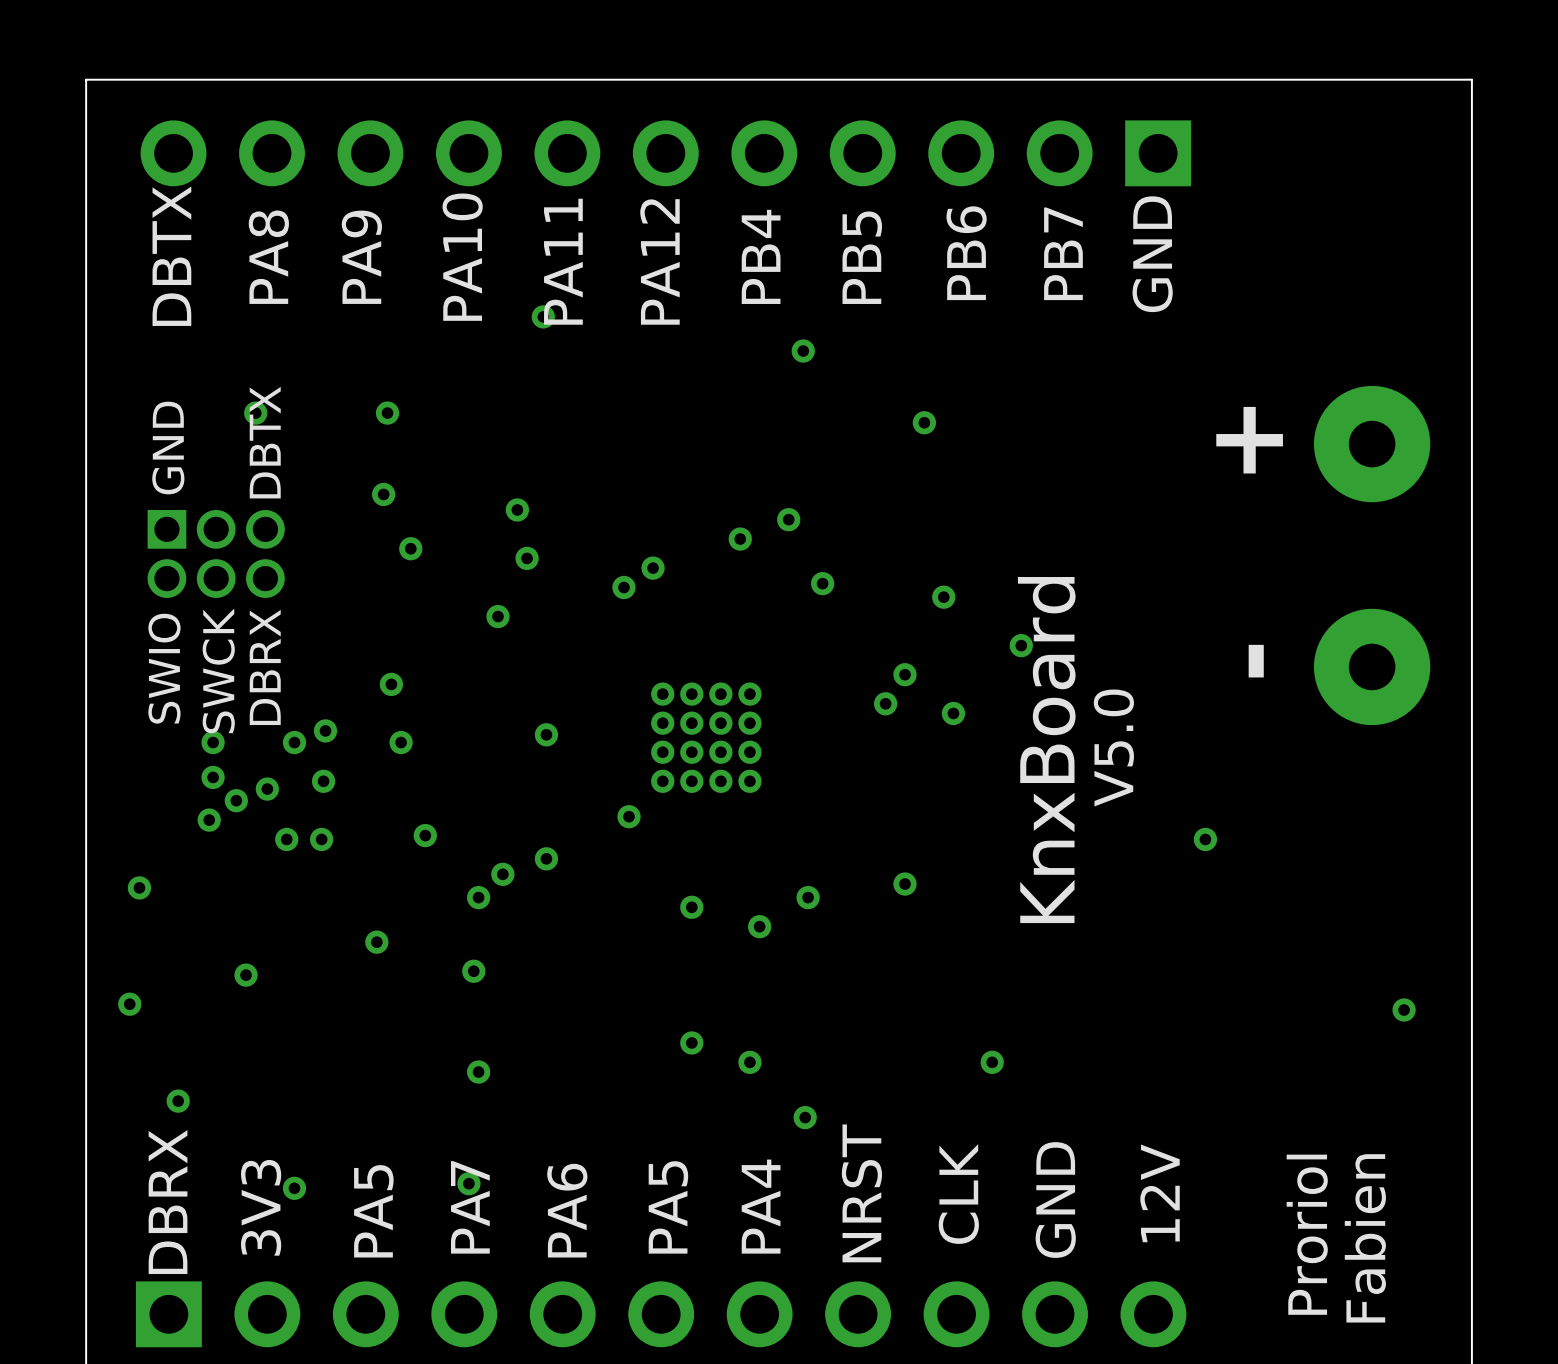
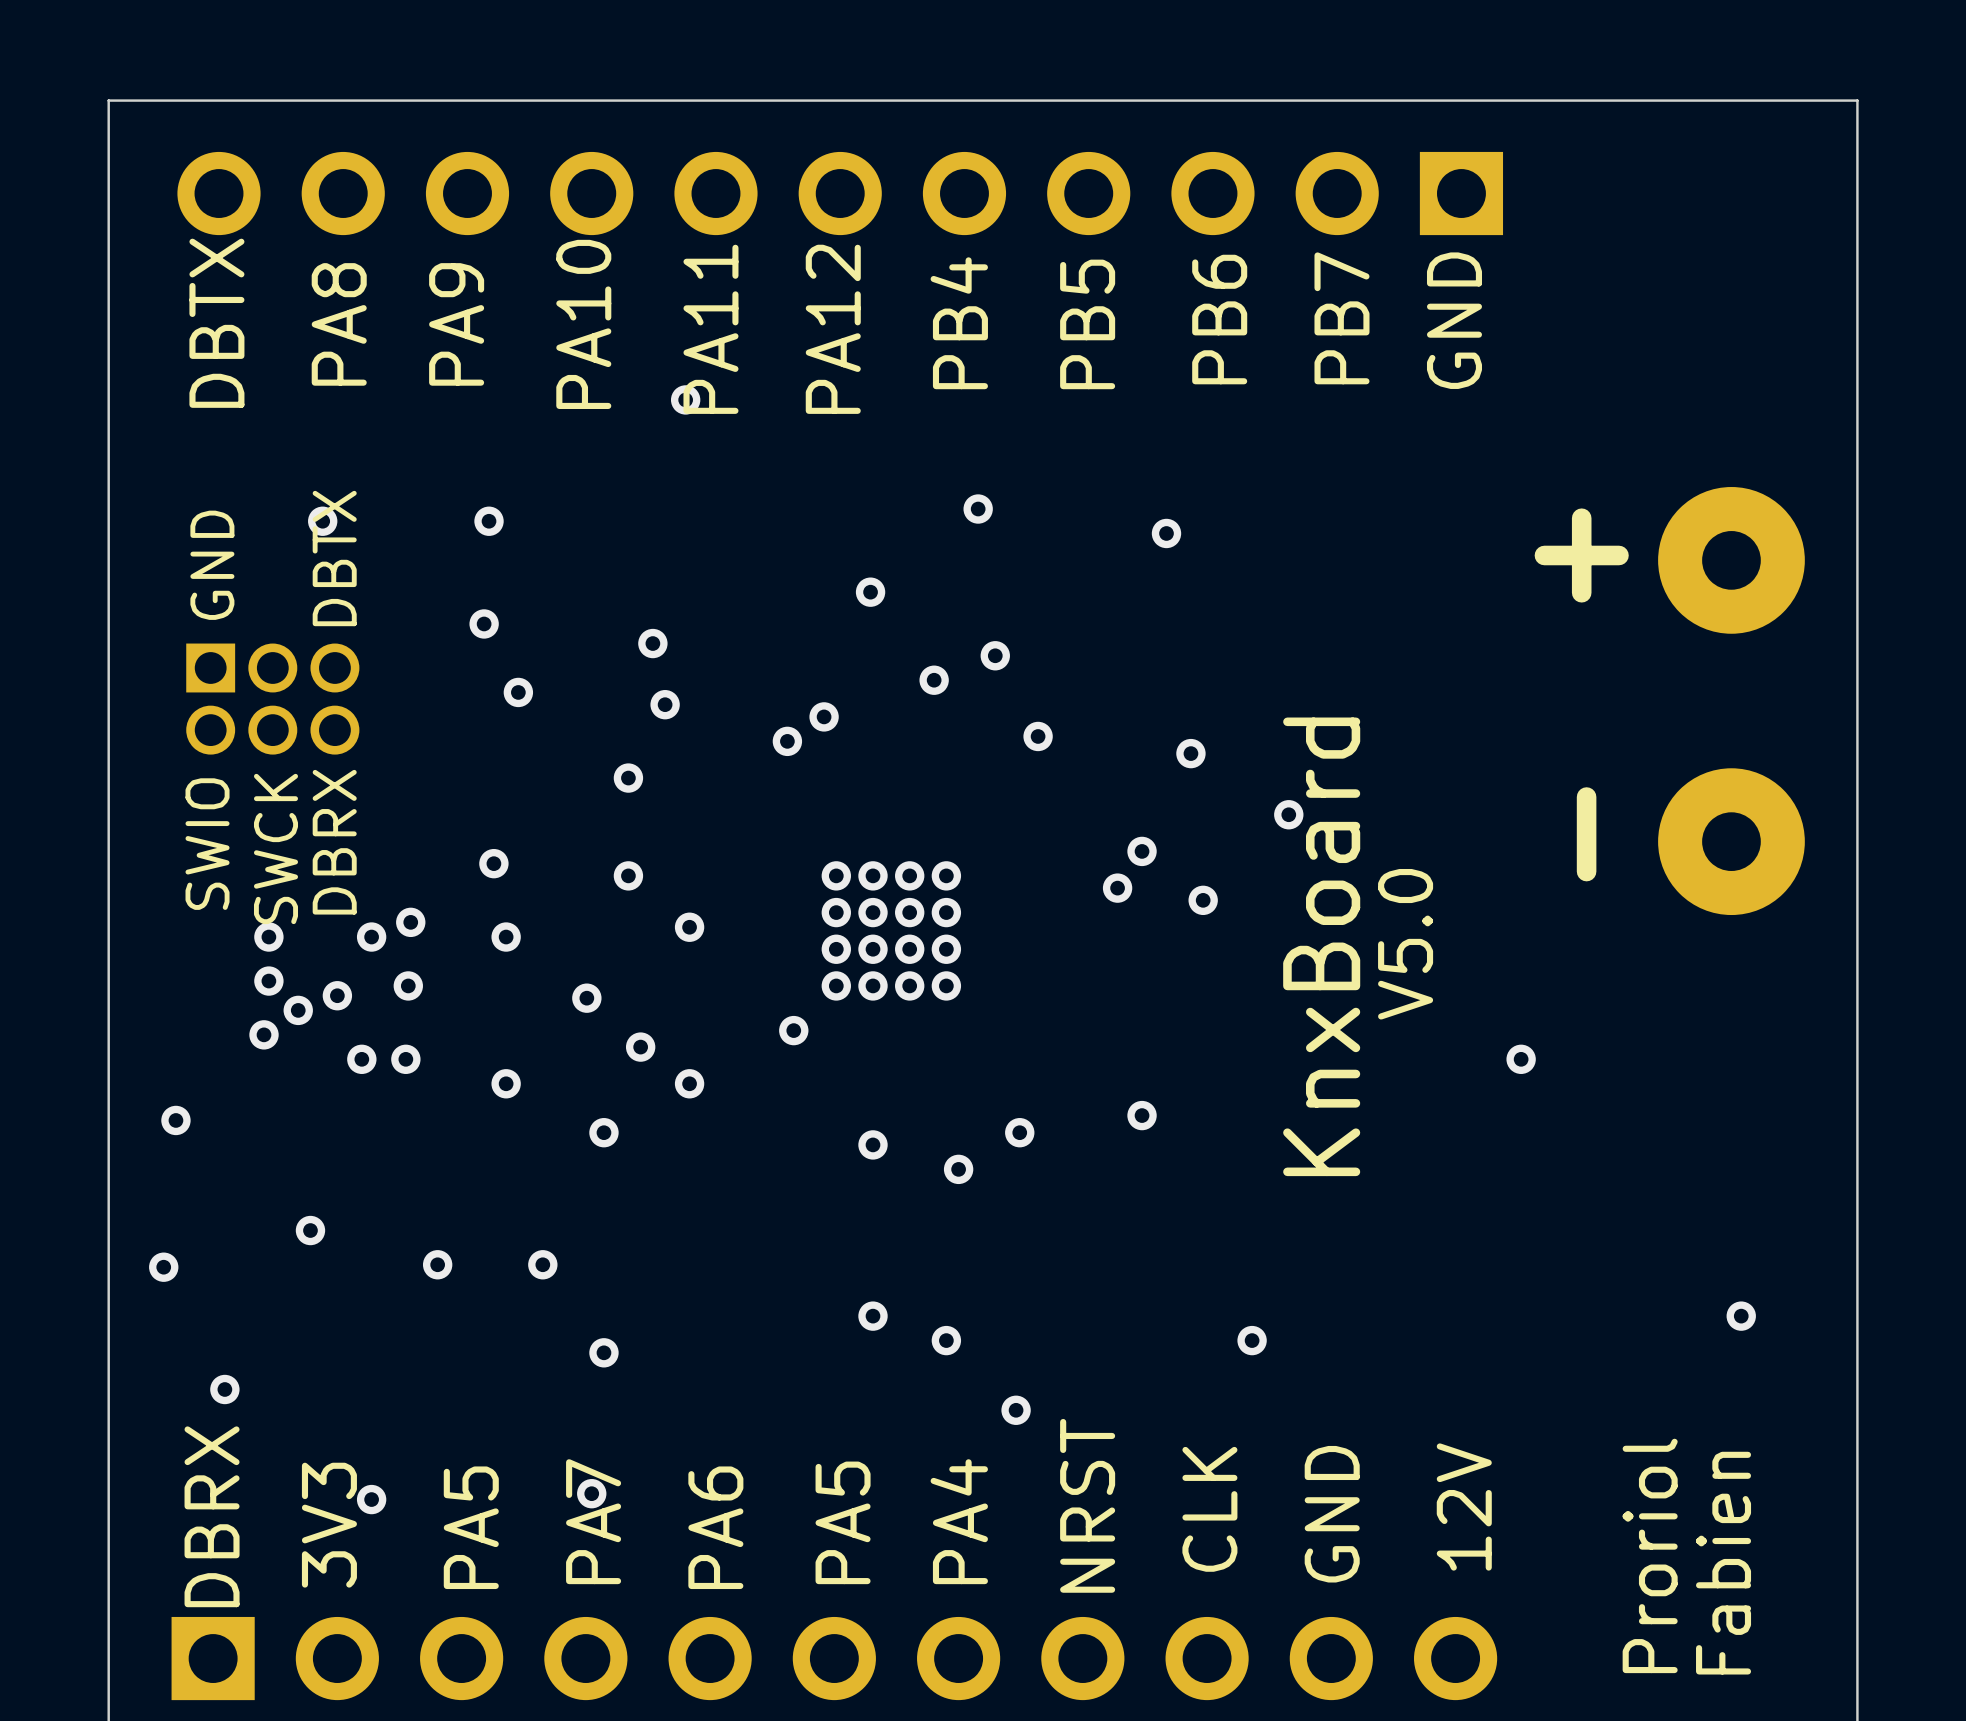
via position: (803, 351) -> (978, 509)
via: none -> (870, 592)
via: none -> (628, 875)
via: none -> (586, 998)
via: none -> (640, 1047)
via: (425, 835) -> none
via: none -> (506, 1083)
via: (502, 874) -> none
via: (376, 942) -> none
via: (473, 971) -> none
via: none -> (437, 1264)
via: none -> (542, 1264)
via position: (1404, 1010) -> (1741, 1316)

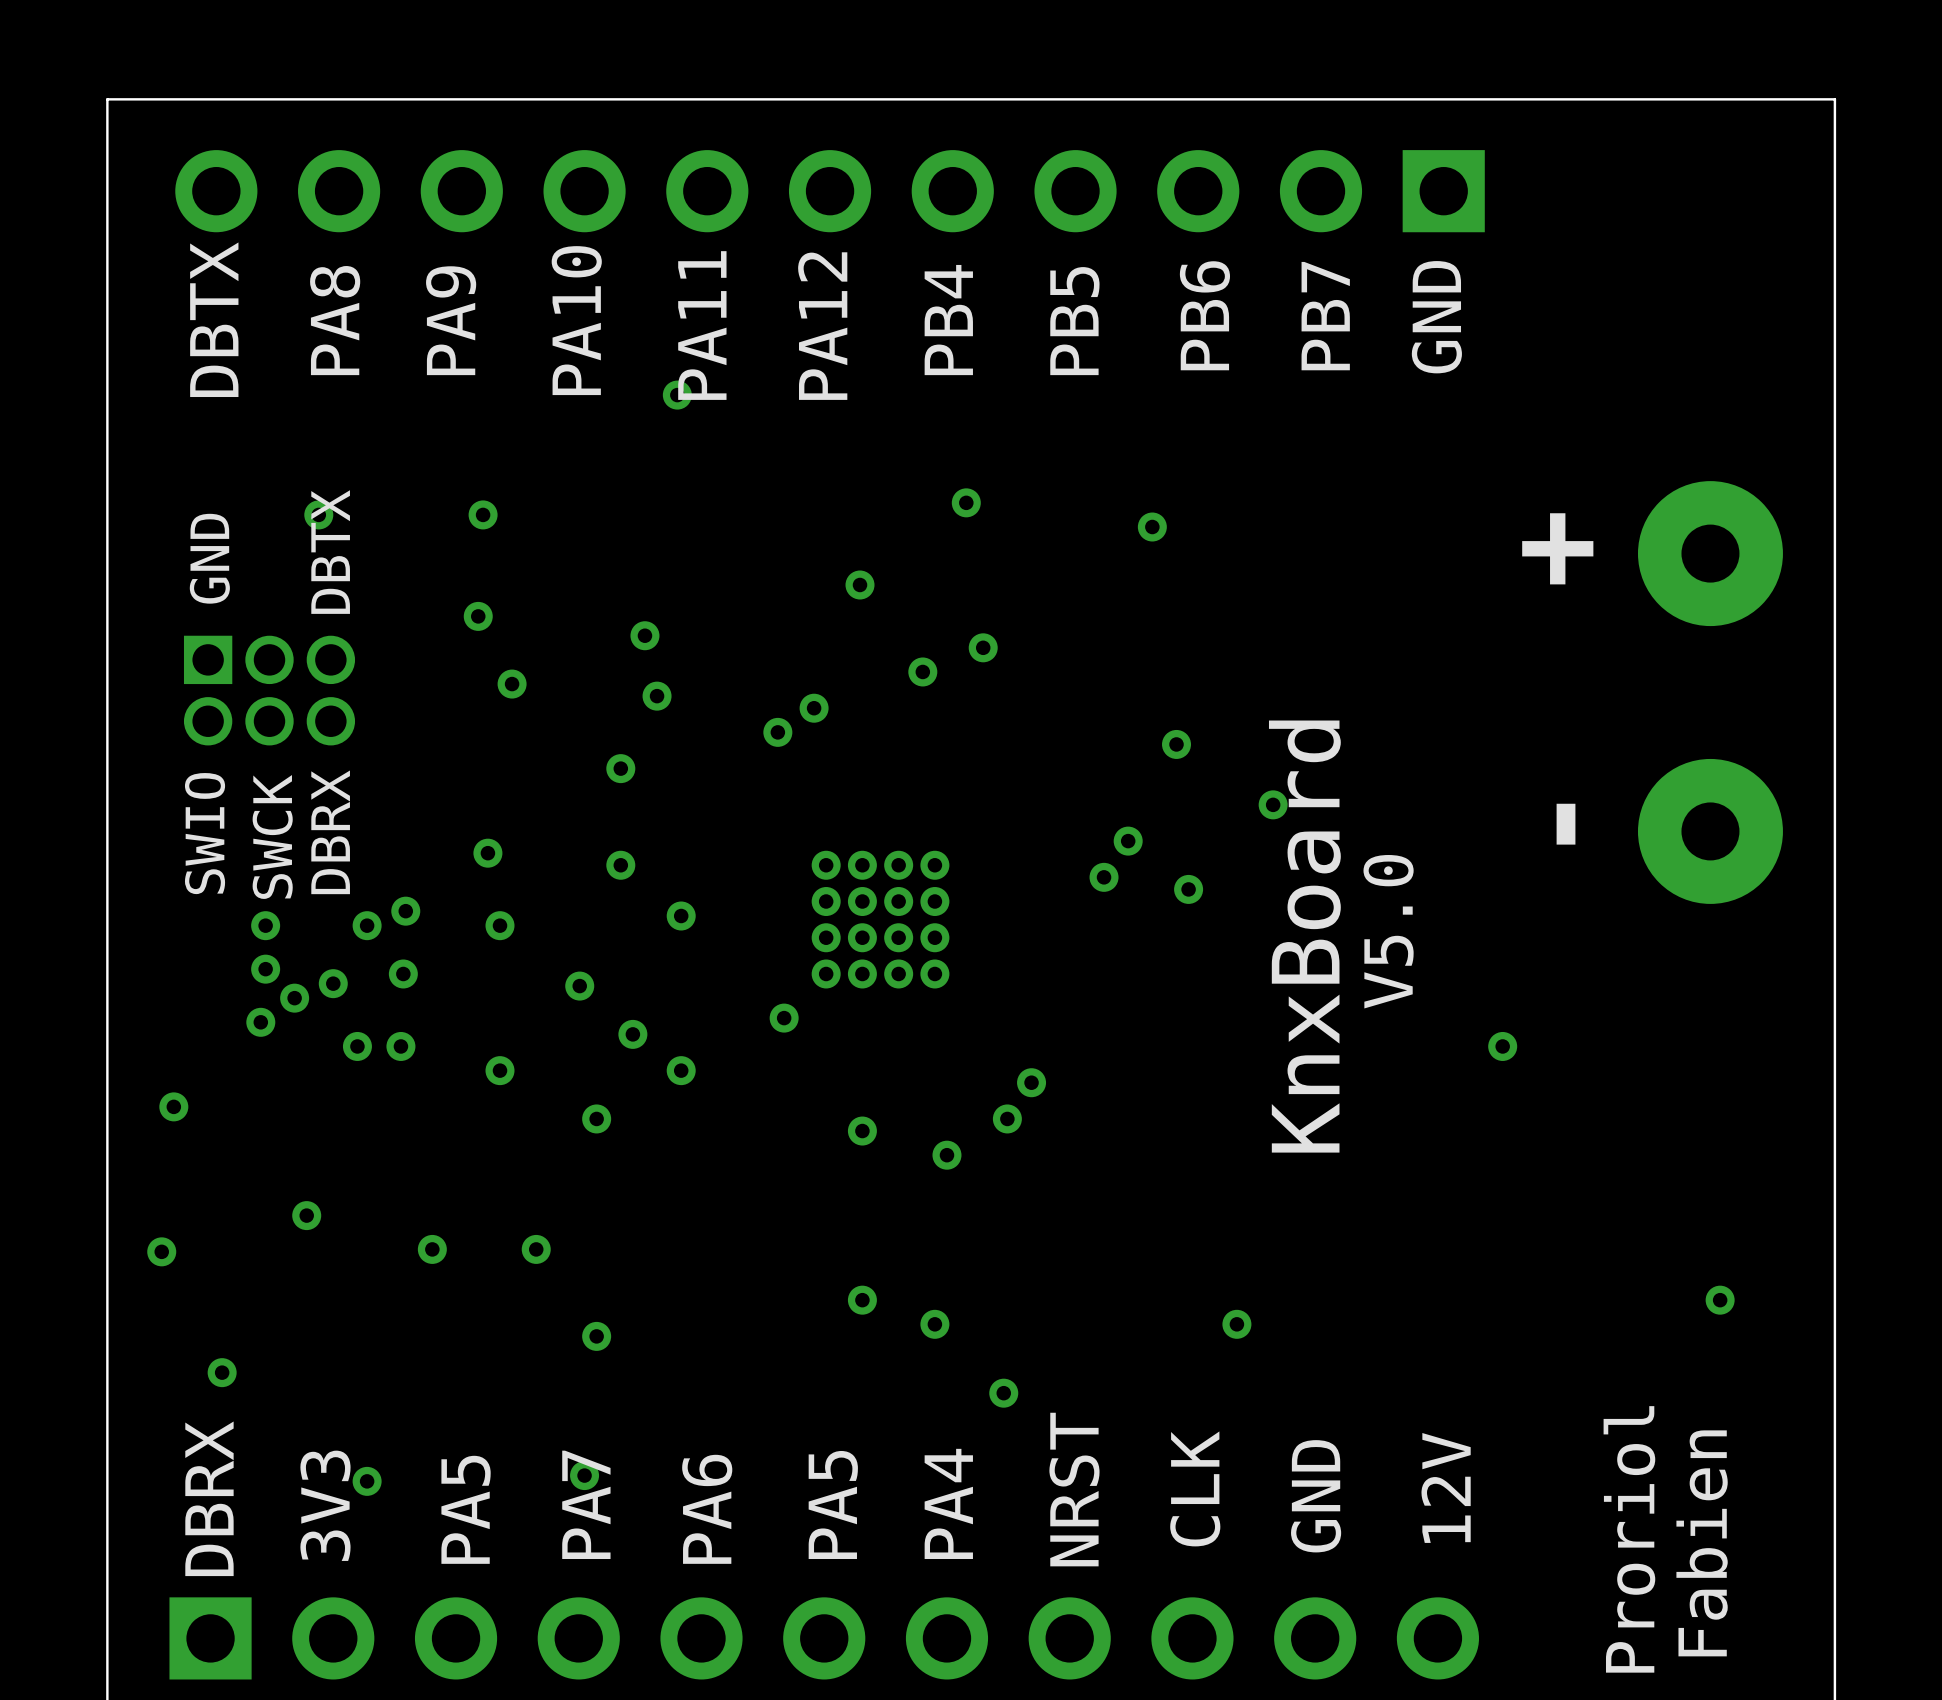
via: (1038, 736) -> none
via position: (1142, 1115) -> (1031, 1082)

